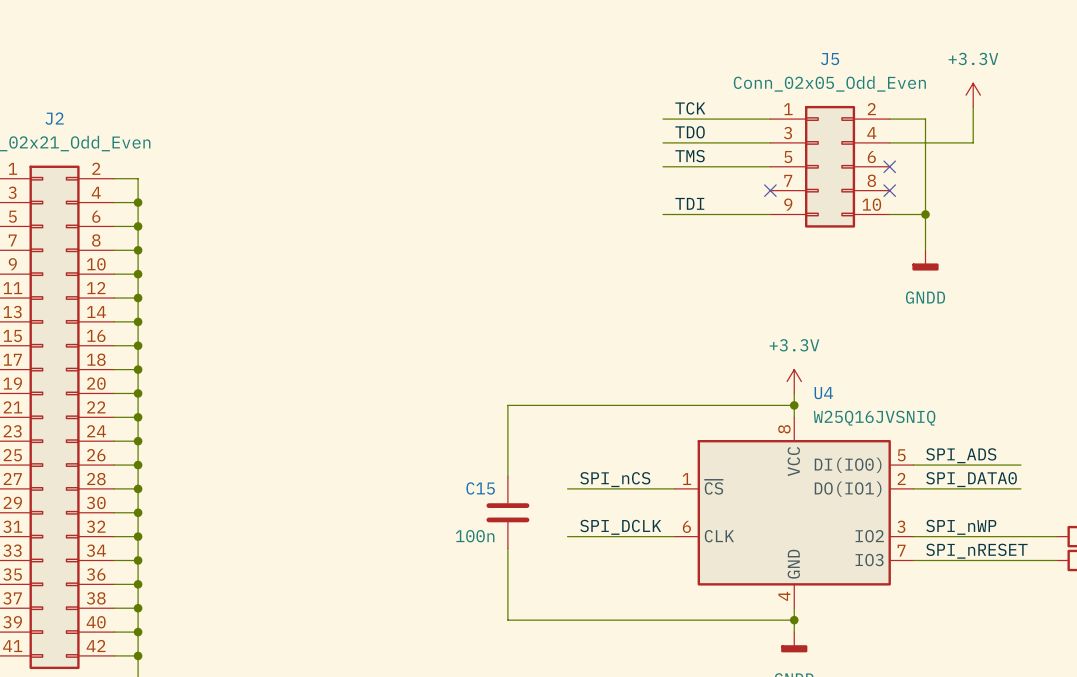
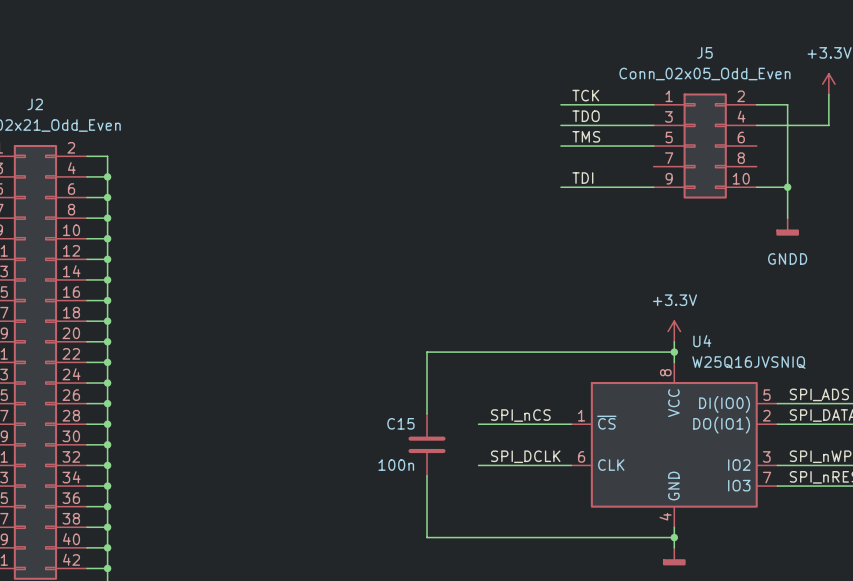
no-connect mark: (889, 166) -> none
no-connect mark: (770, 190) -> none
no-connect mark: (889, 190) -> none

